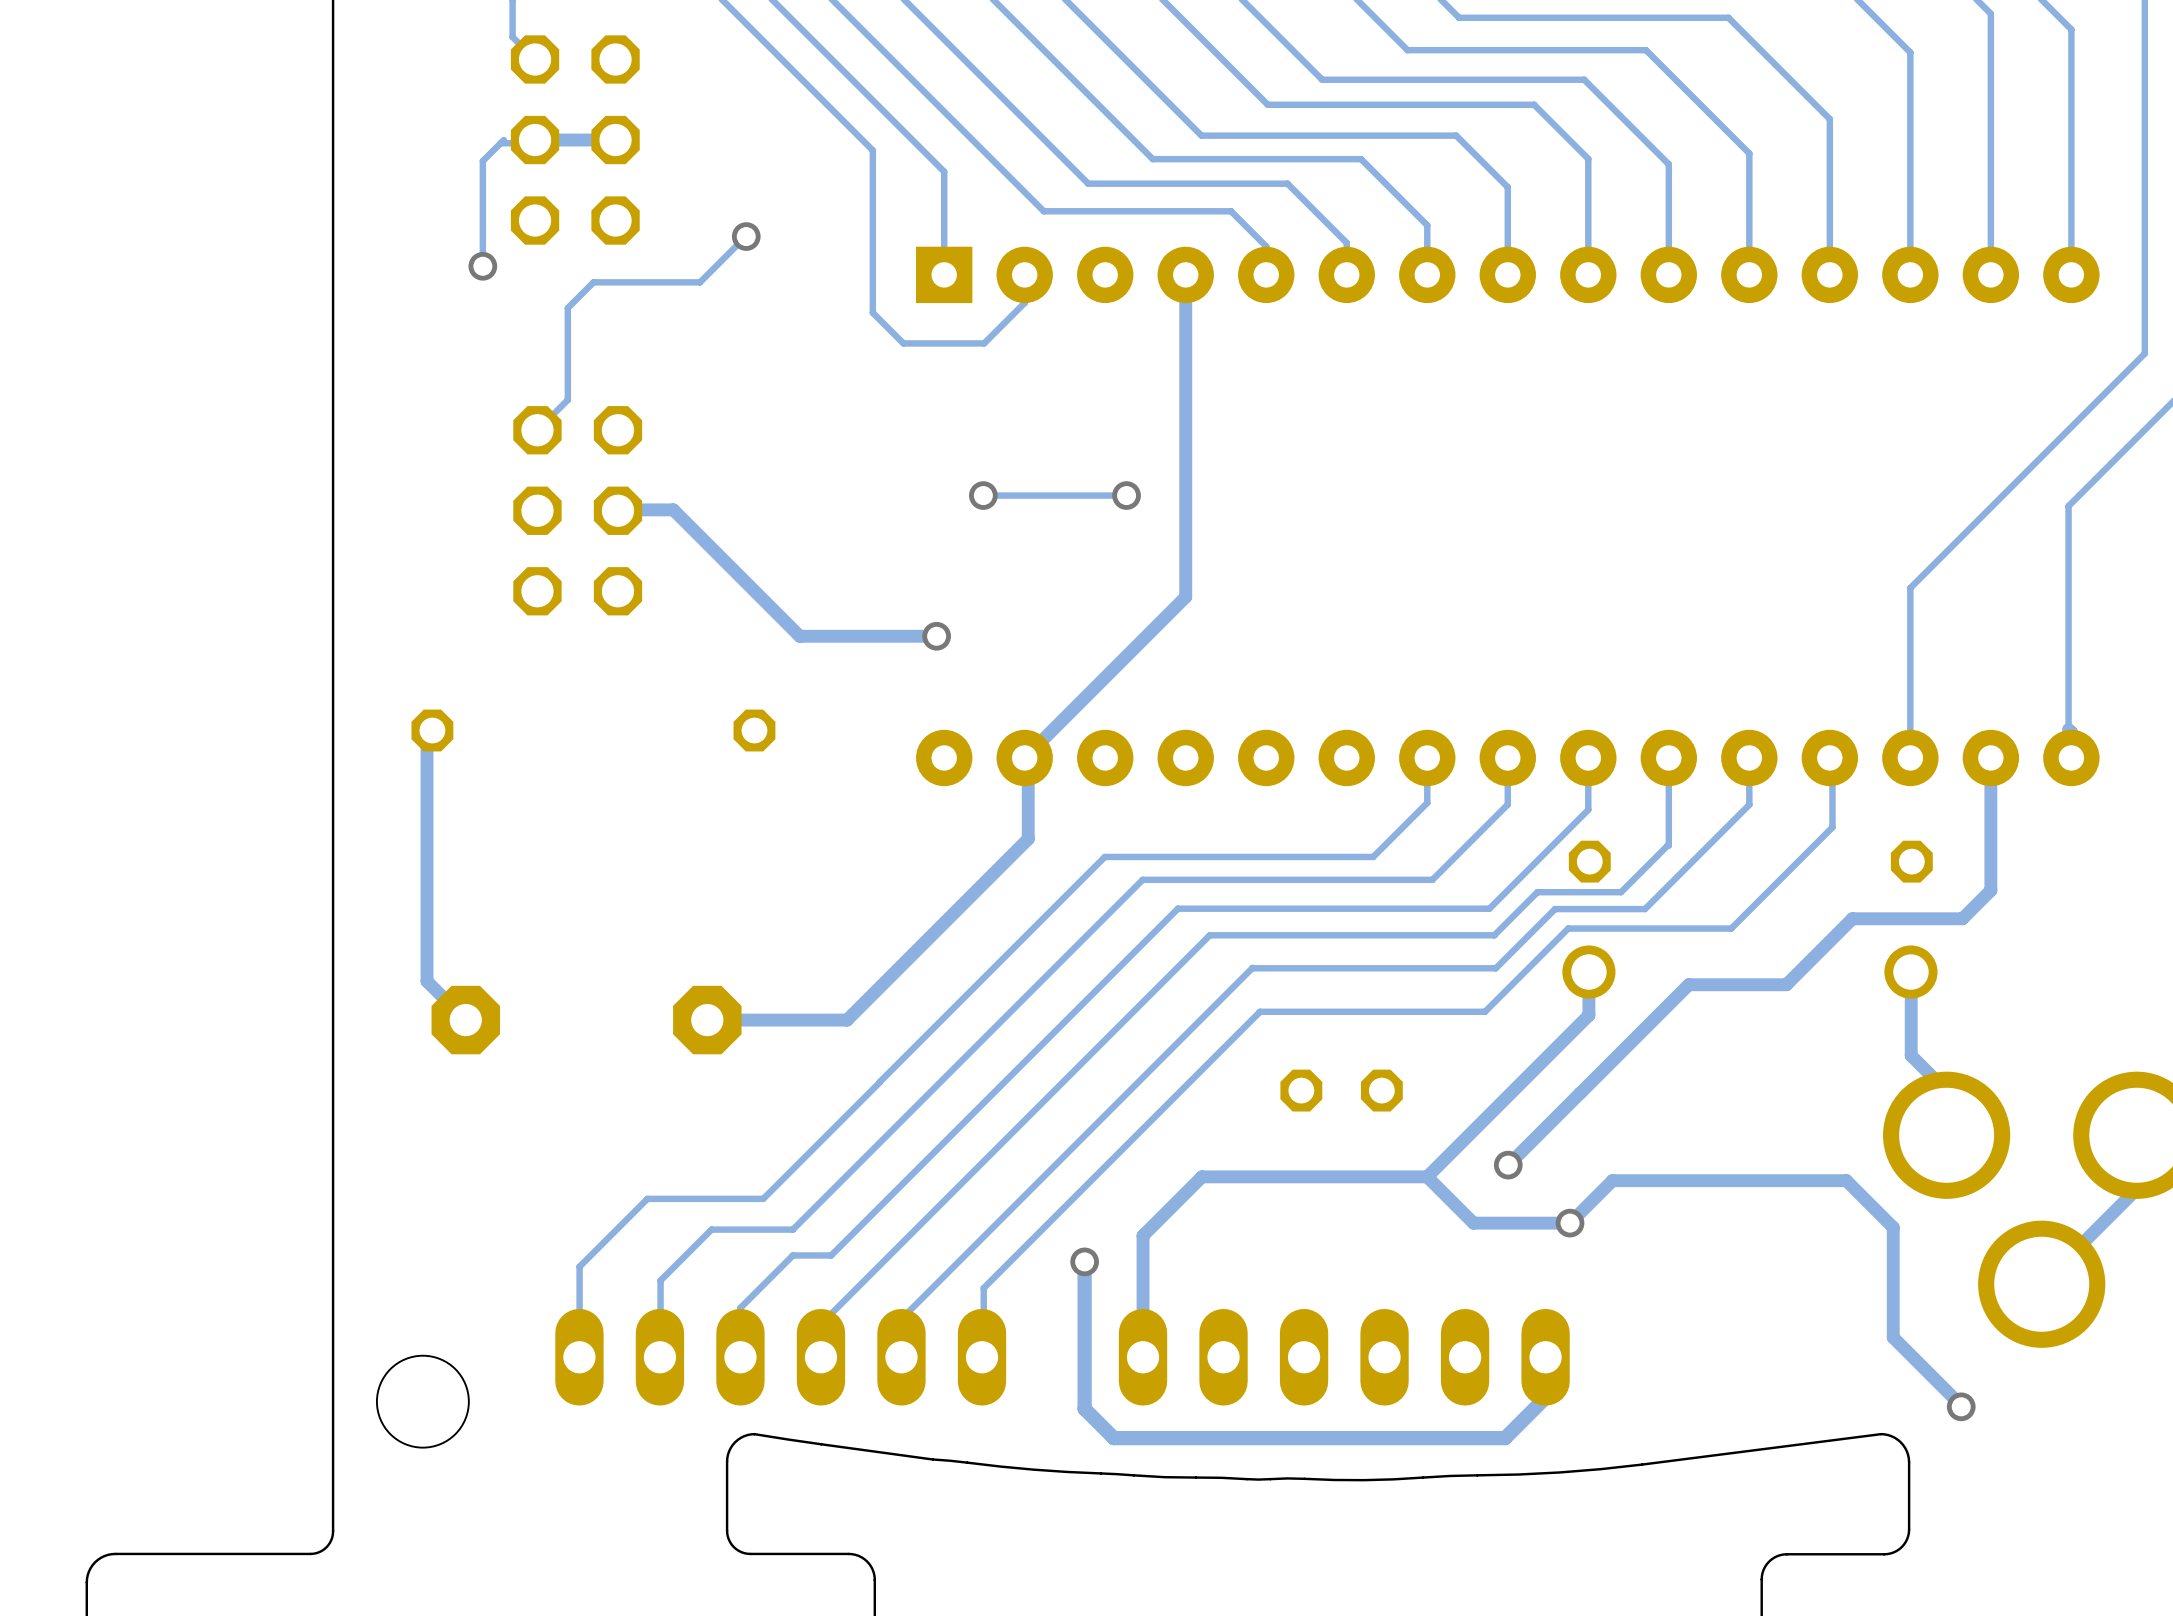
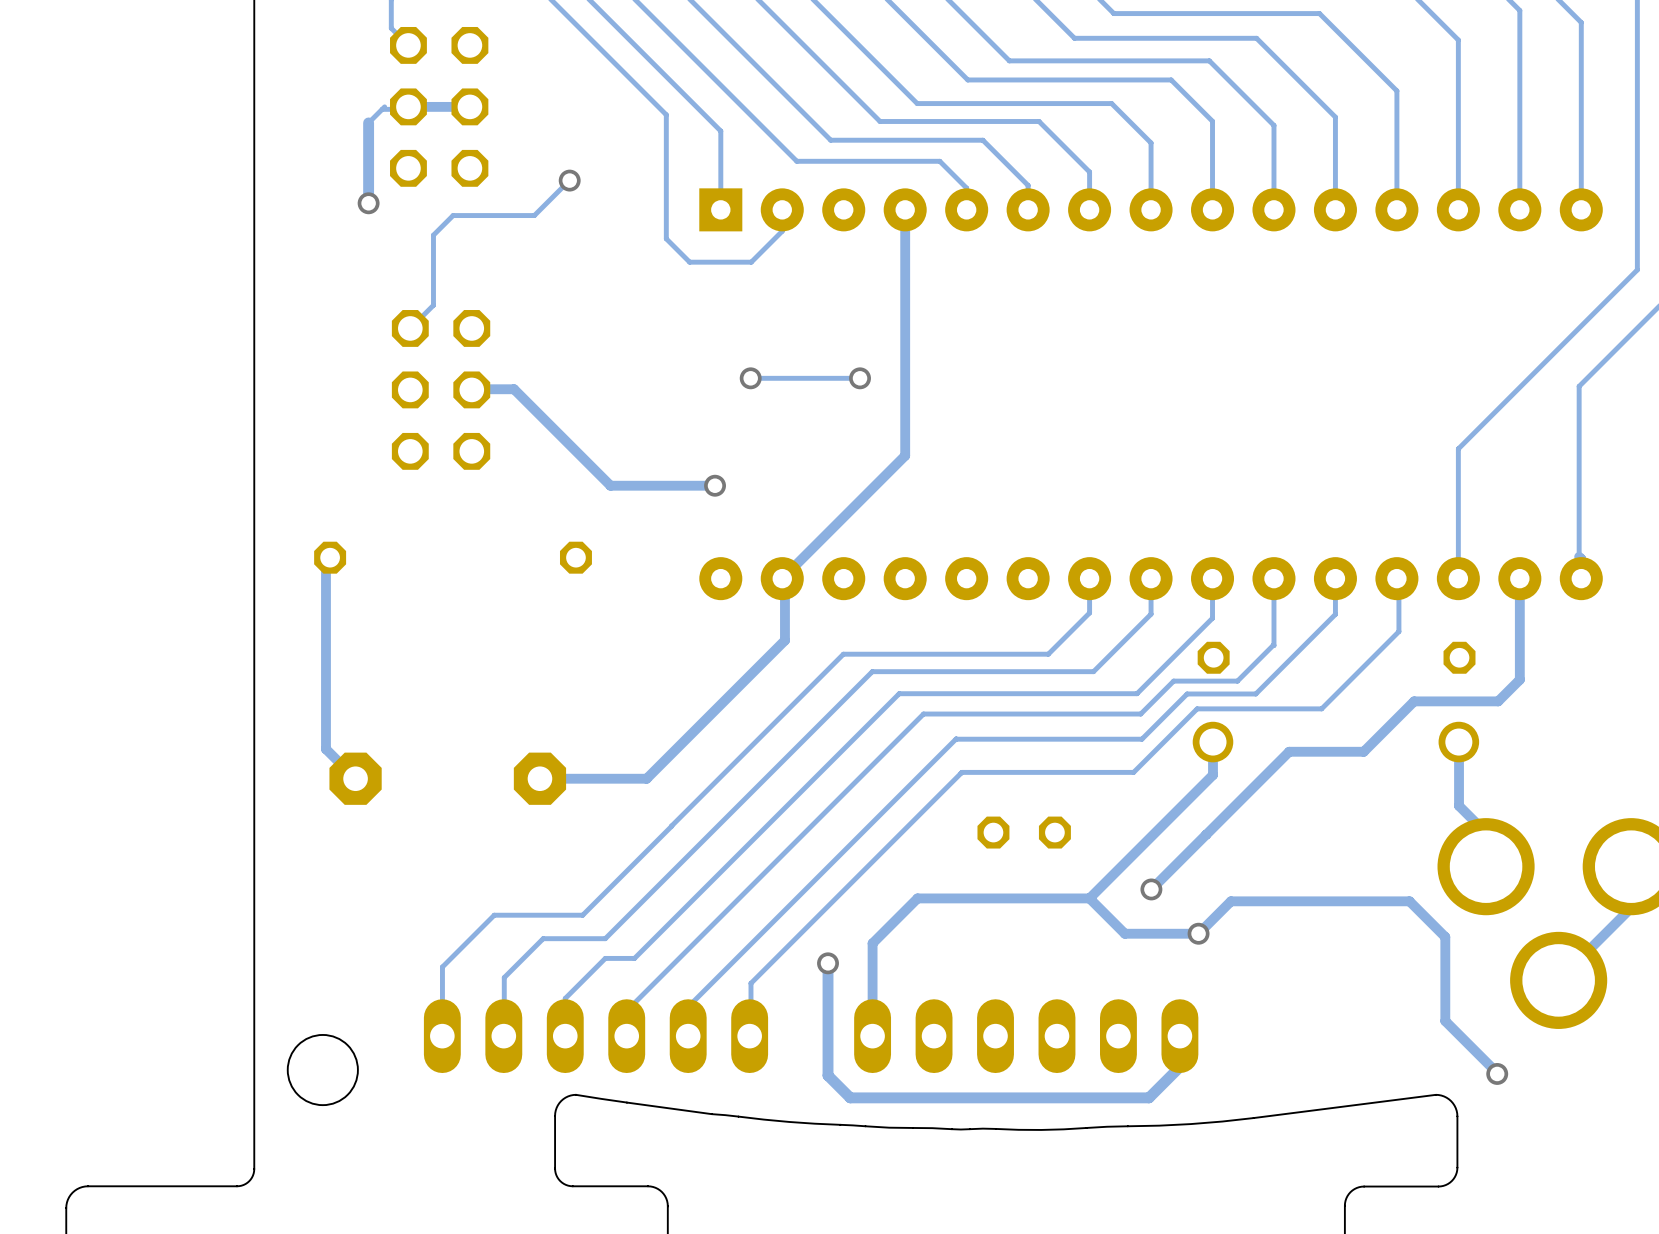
track width: thin (482, 161) (482, 266) -> thick (368, 122) (368, 203)

